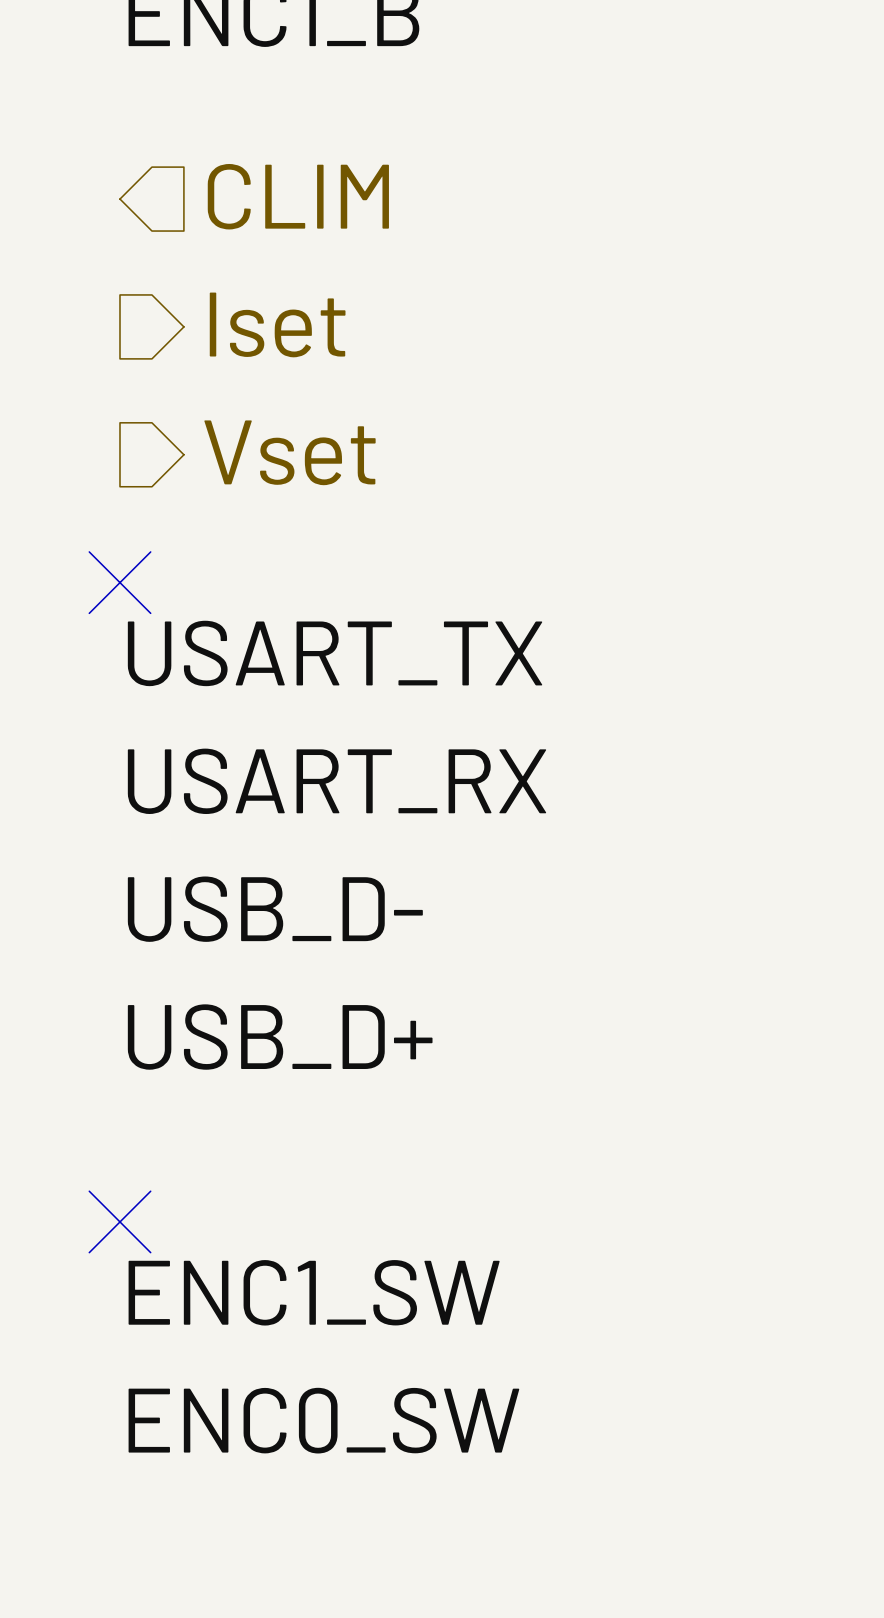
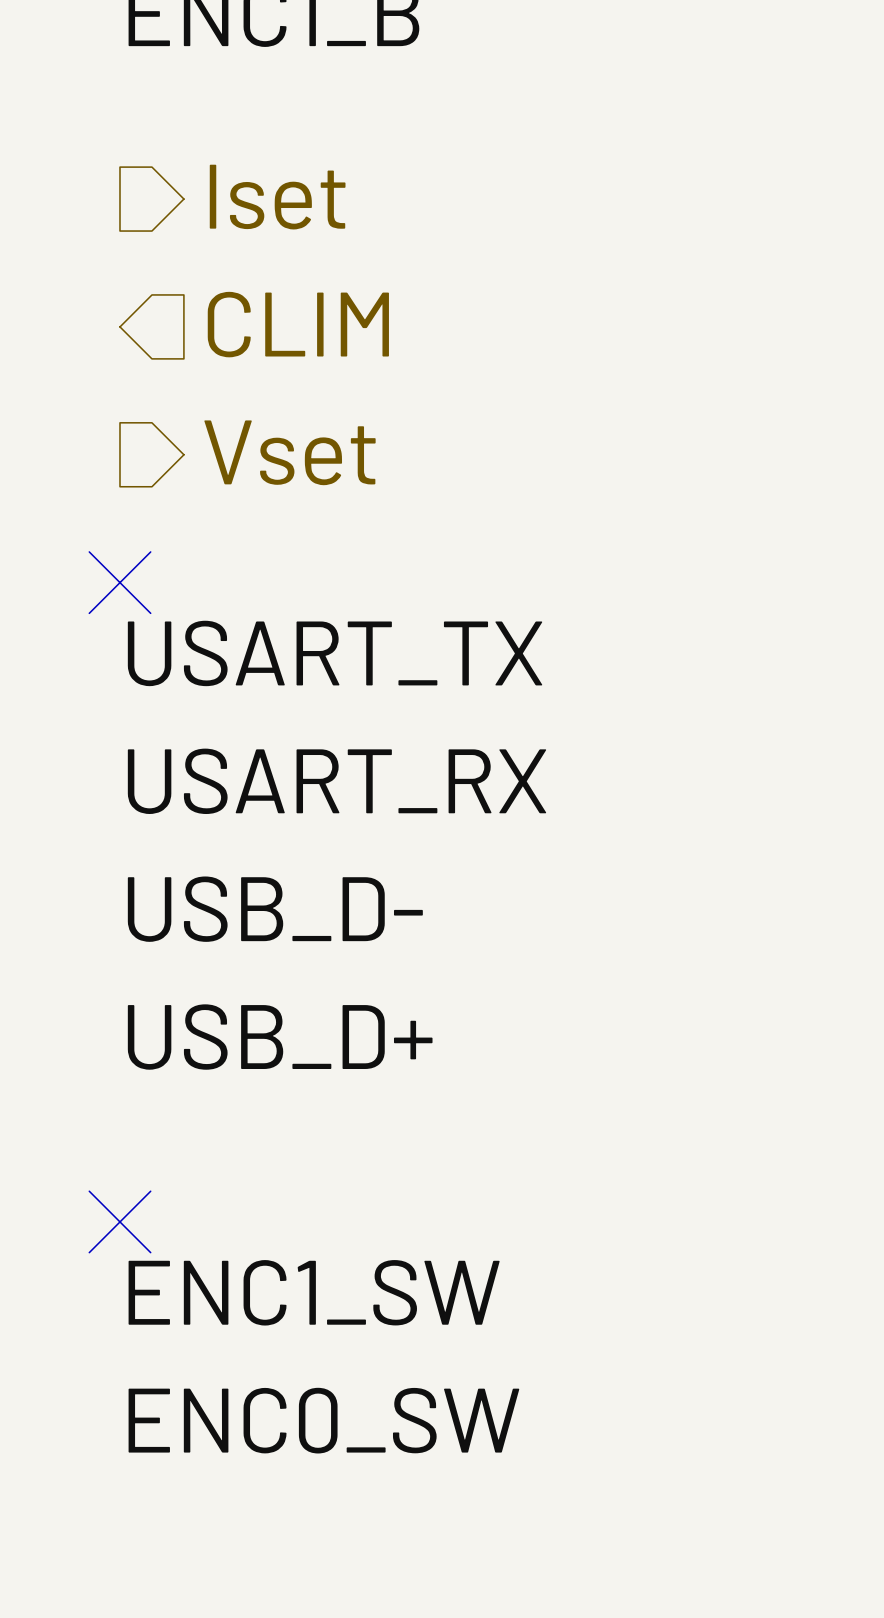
hierarchical label shape: input (298, 196) -> output (277, 197)
hierarchical label: CLIM (298, 196) -> Iset (277, 197)
hierarchical label shape: output (277, 324) -> input (298, 324)
hierarchical label: Iset (277, 324) -> CLIM (298, 324)

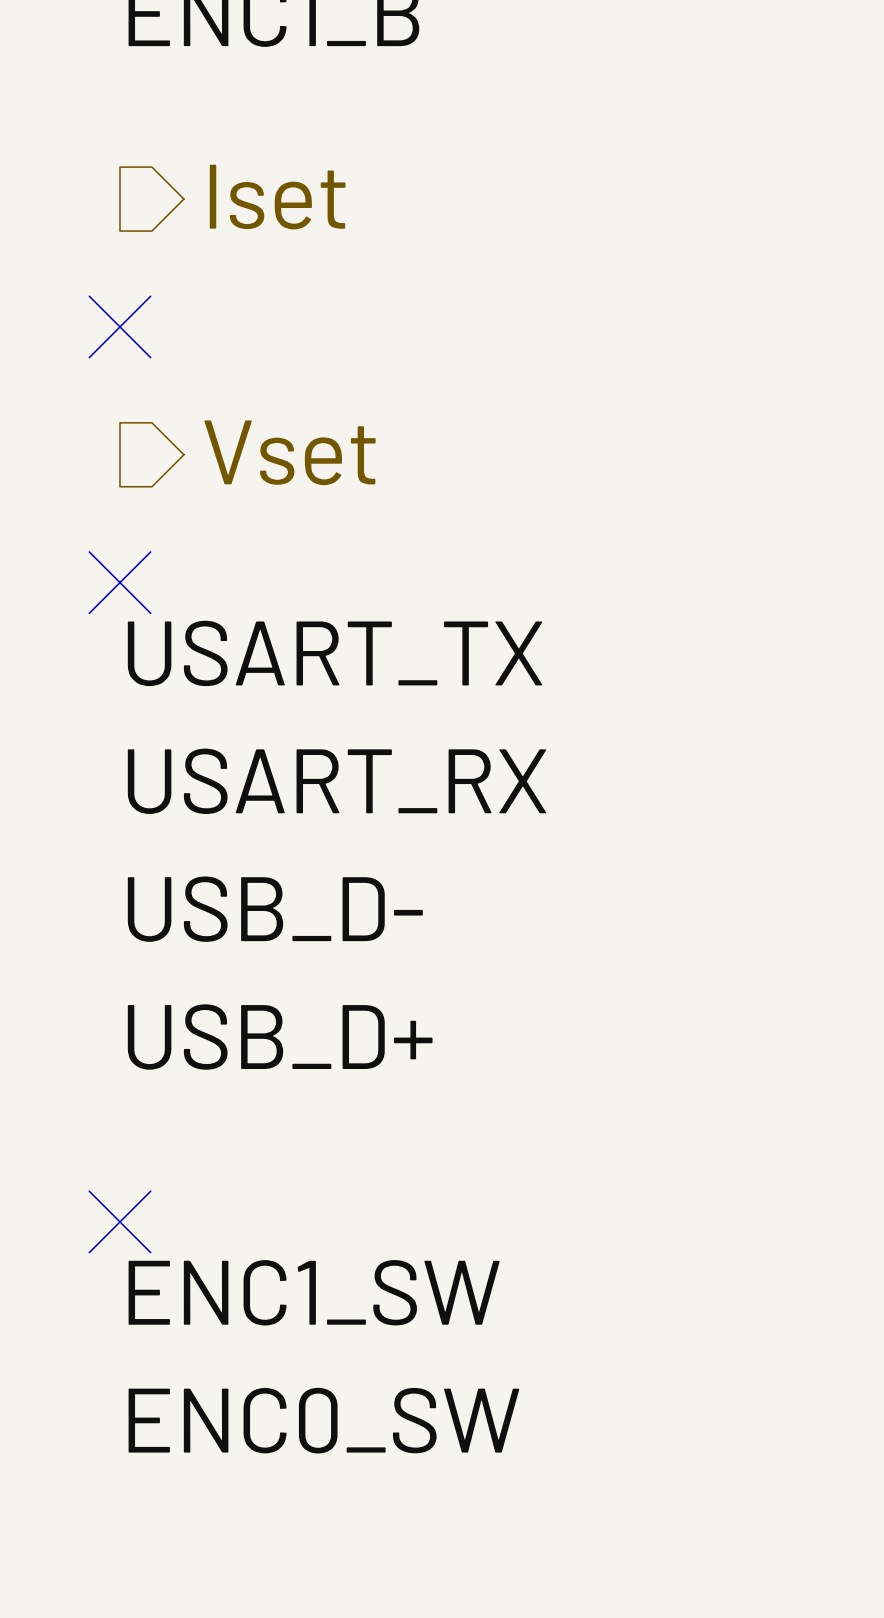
hierarchical label: CLIM (298, 324) -> none
no-connect mark: none -> (119, 326)

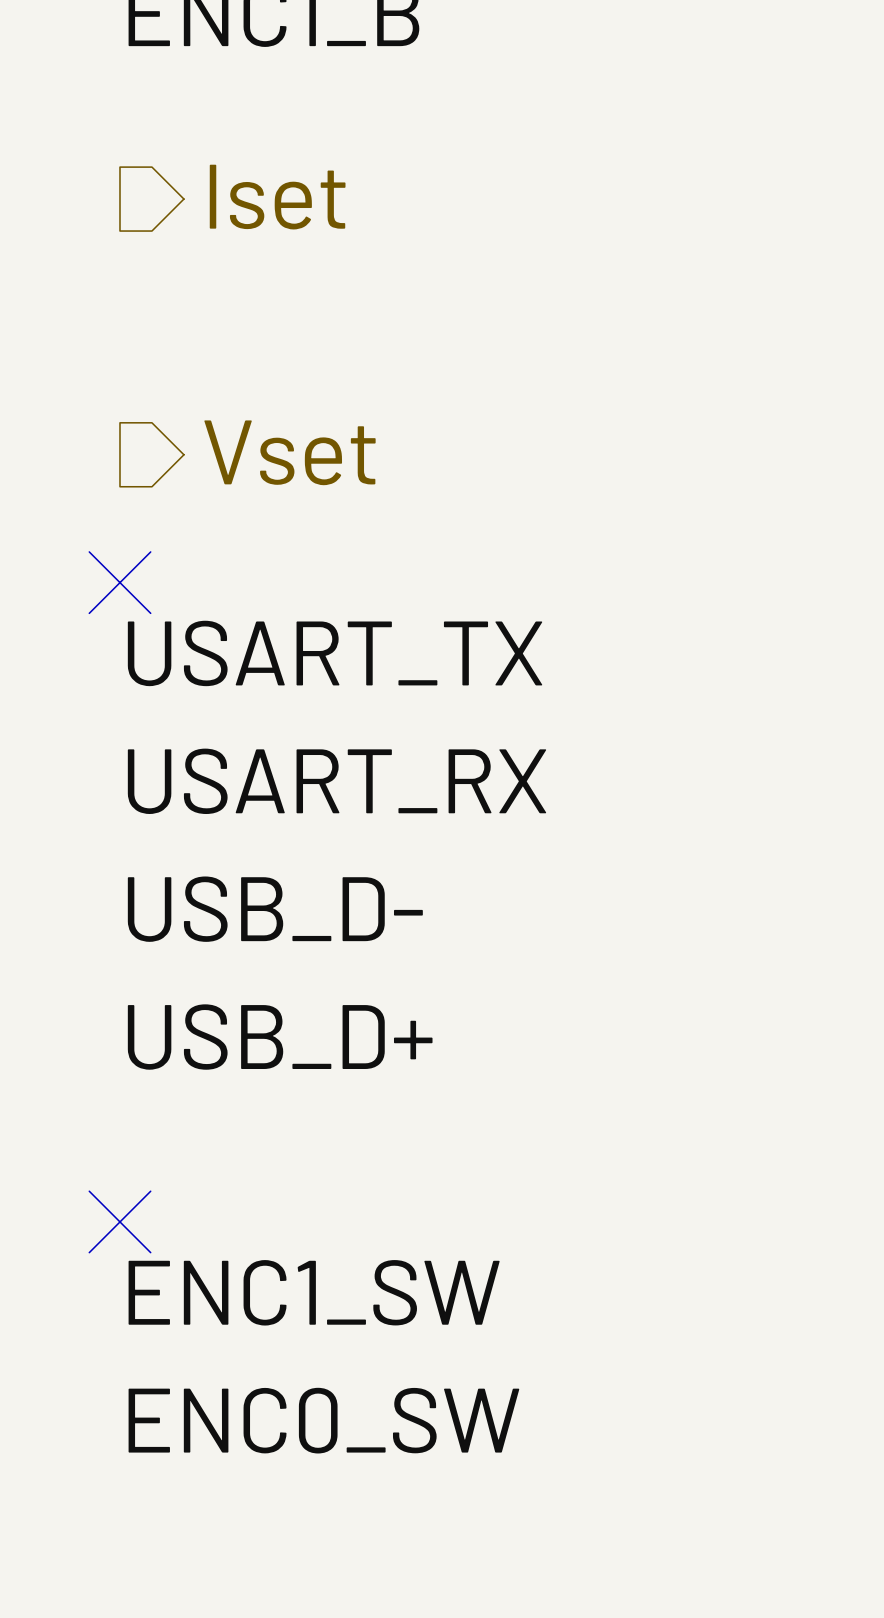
no-connect mark: (119, 326) -> none

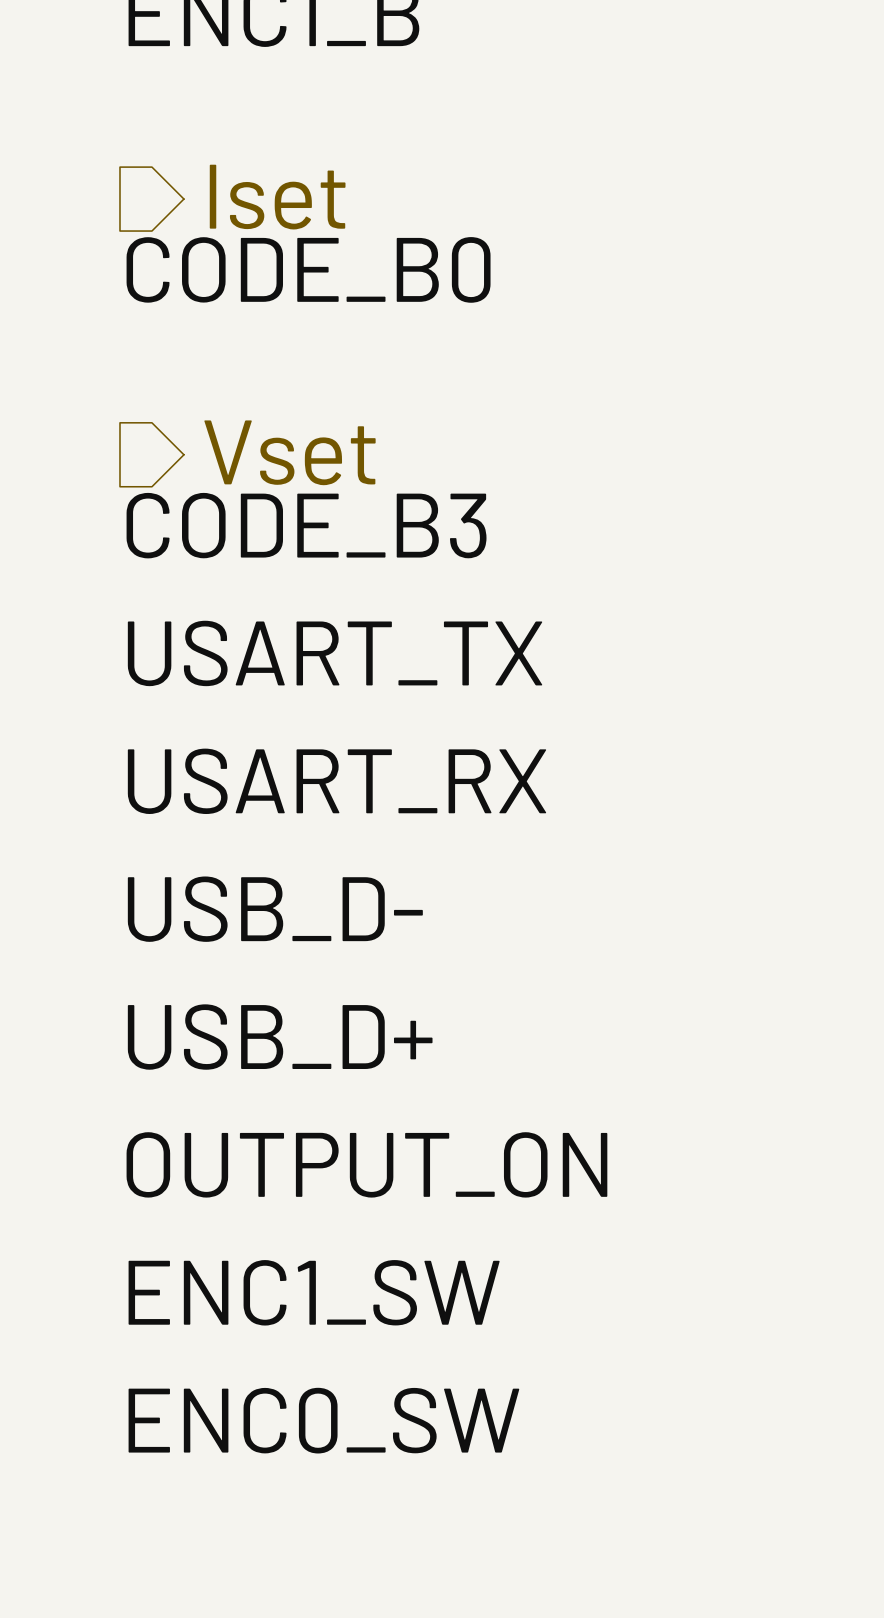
label: none -> CODE_B0 (308, 269)
label: none -> CODE_B3 (306, 525)
no-connect mark: (119, 582) -> none
label: none -> OUTPUT_ON (366, 1164)
no-connect mark: (119, 1221) -> none

